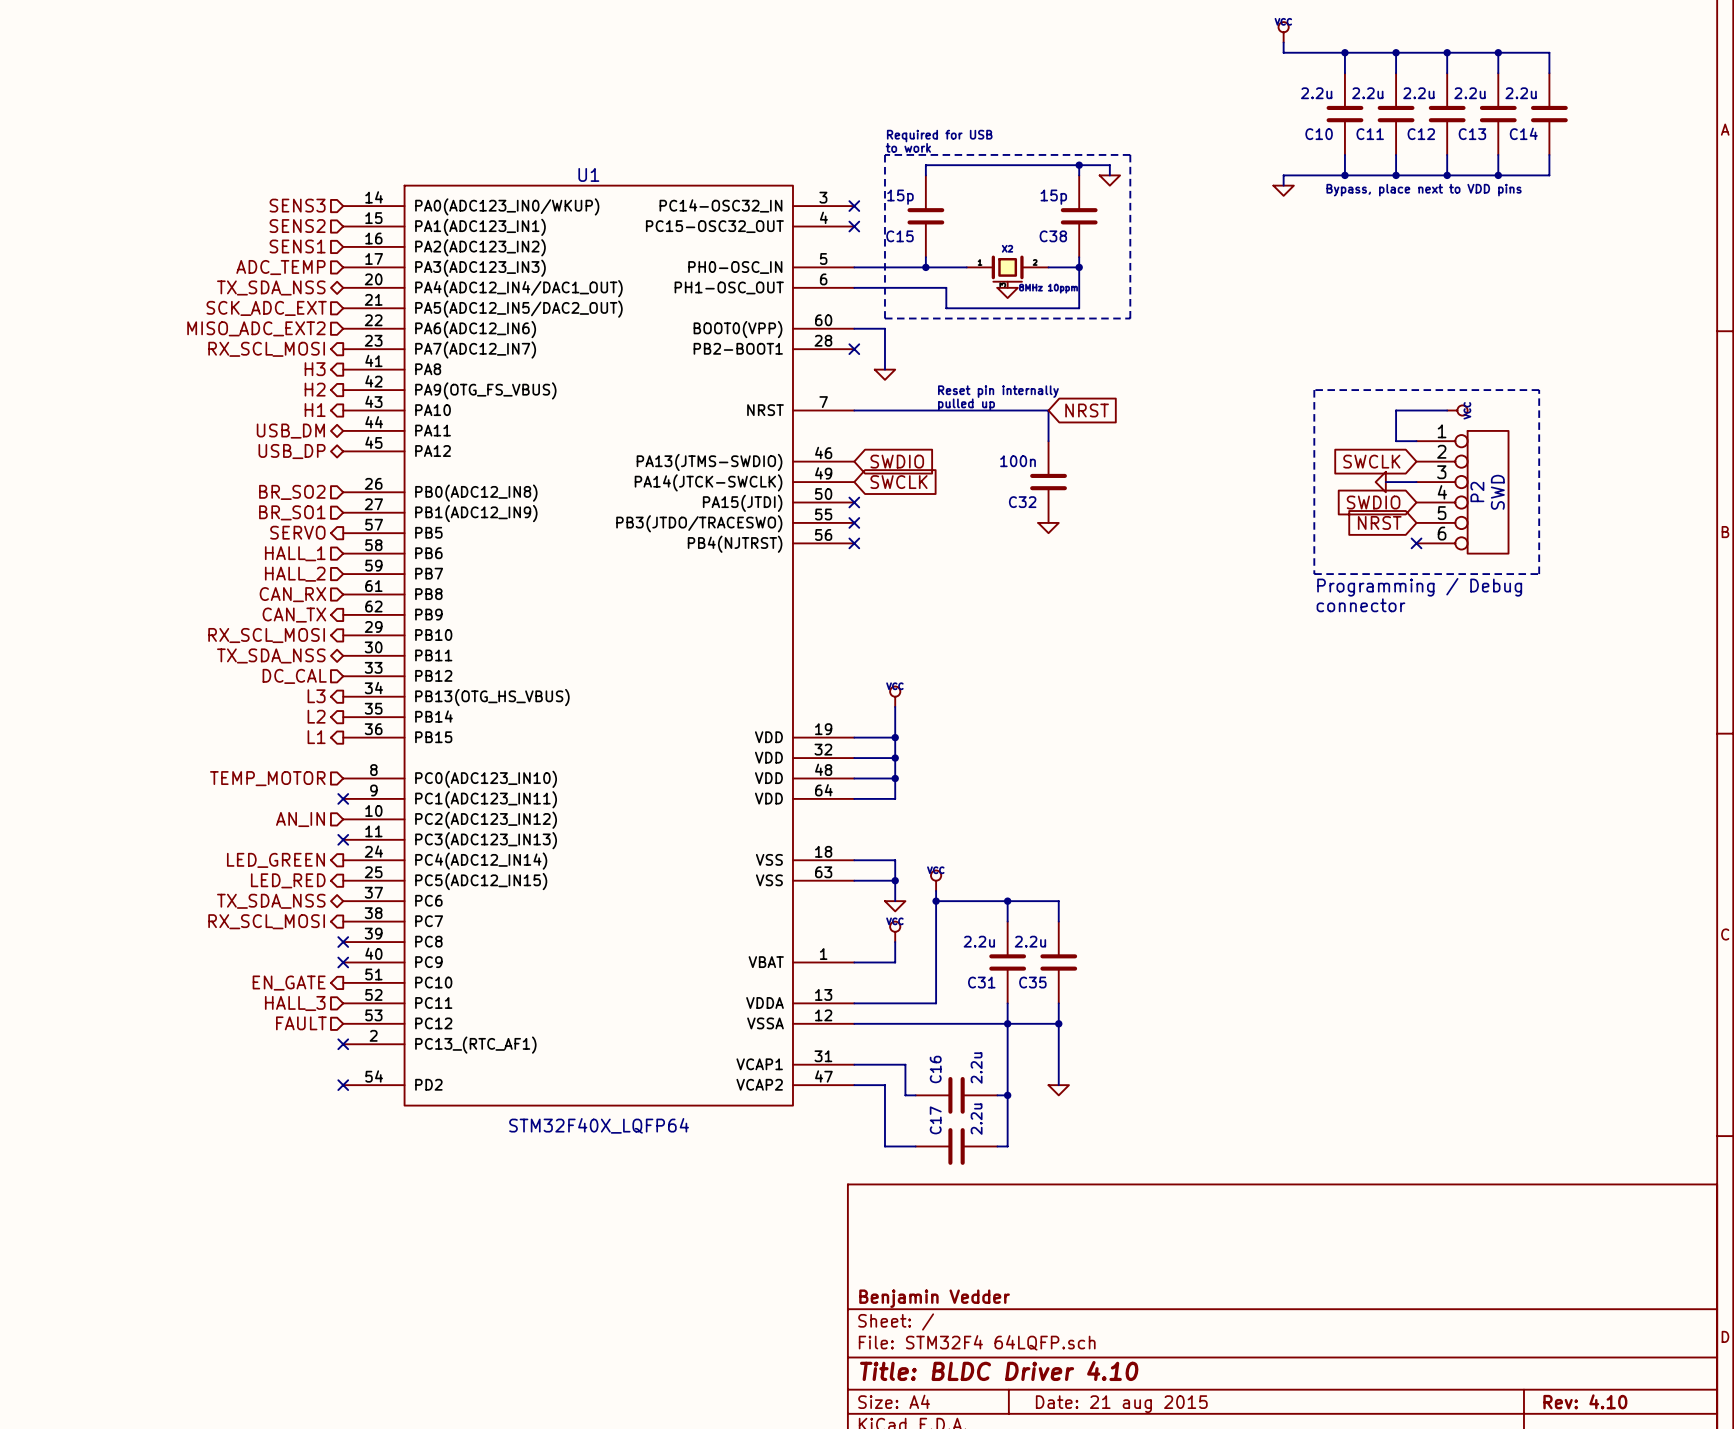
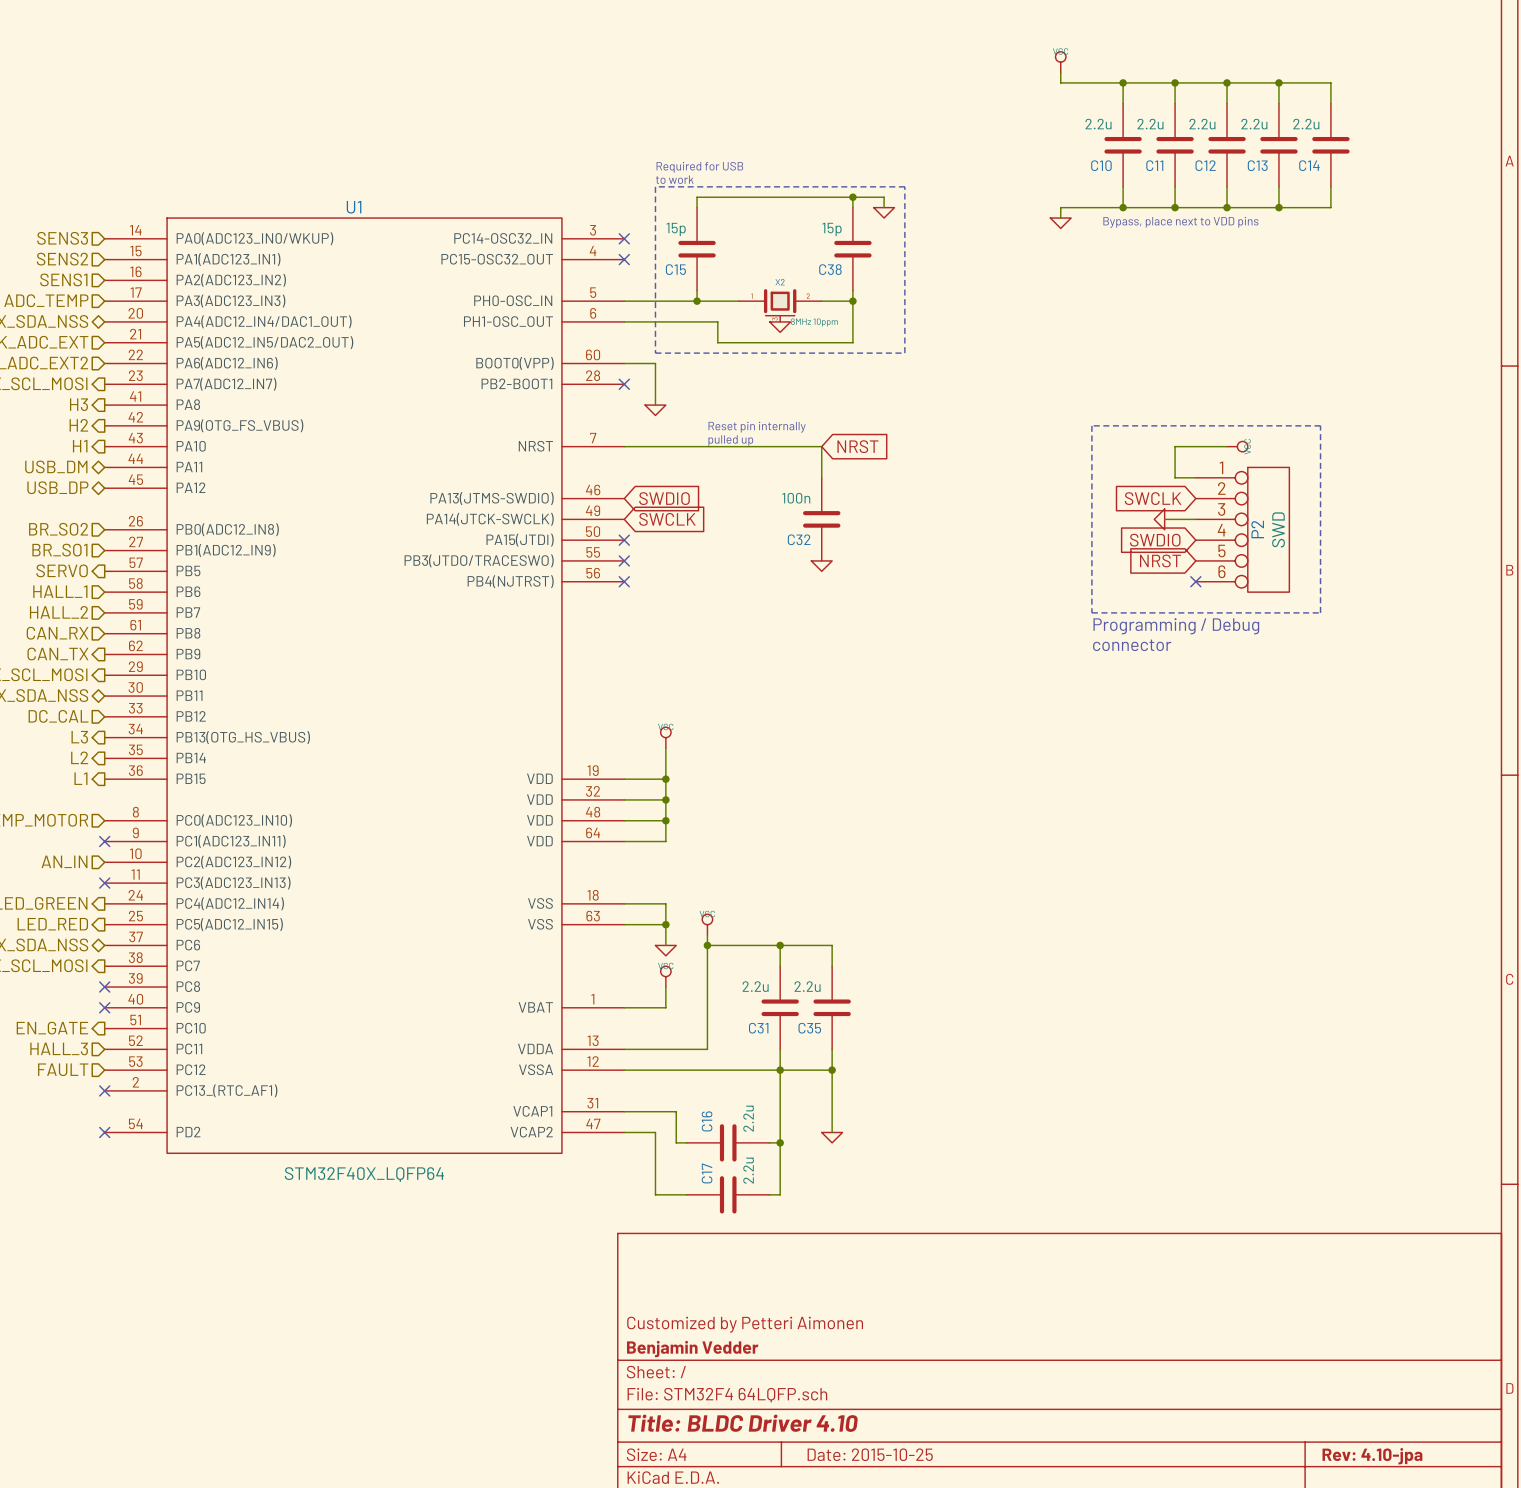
title block: none -> Customized by Petteri Aimonen (745, 1324)
title block: Rev: 4.10 (1585, 1401) -> Rev: 4.10-jpa (1372, 1456)
title block: Date: 21 aug 2015 (1121, 1404) -> Date: 2015-10-25 (870, 1454)

